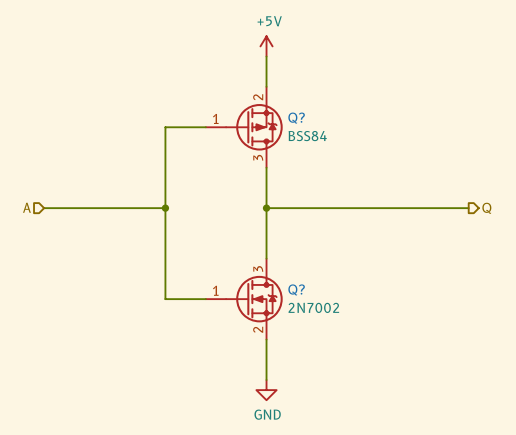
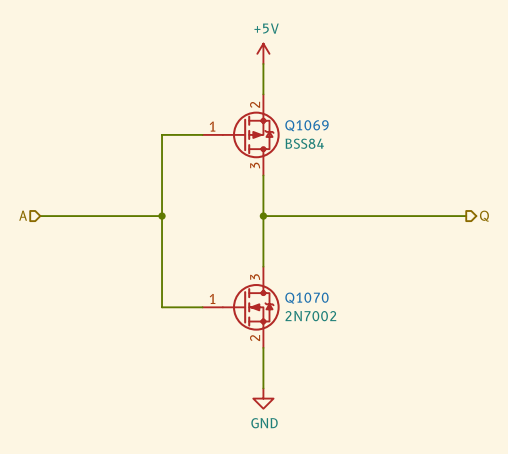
Q? name: Q? (296, 118) -> Q1069 (307, 125)
Q? name: Q? (296, 289) -> Q1070 (306, 298)

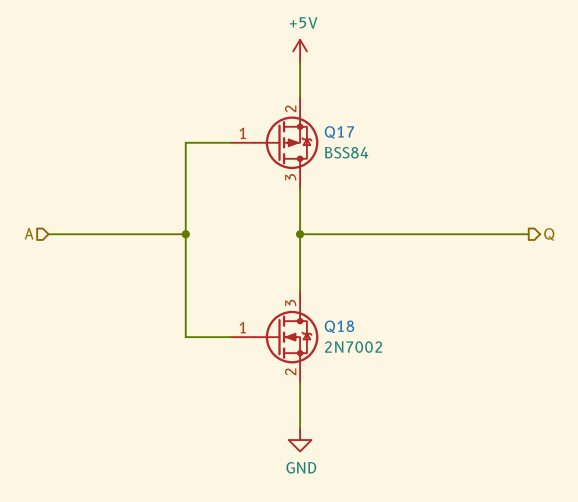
Q1069 name: Q1069 (307, 125) -> Q17 (339, 132)
Q1070 name: Q1070 (306, 298) -> Q18 (339, 326)

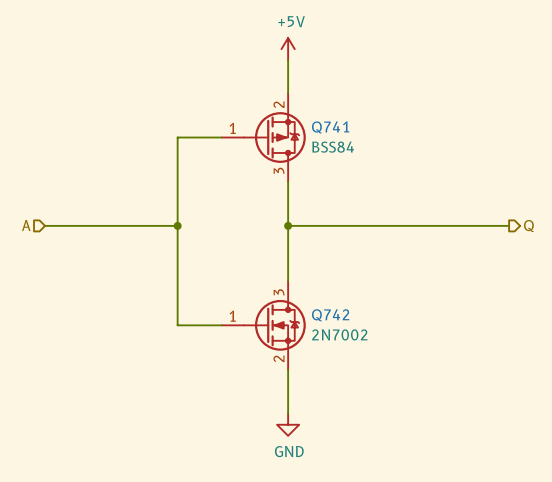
Q17 name: Q17 (339, 132) -> Q741 (330, 127)
Q18 name: Q18 (339, 326) -> Q742 (330, 315)

